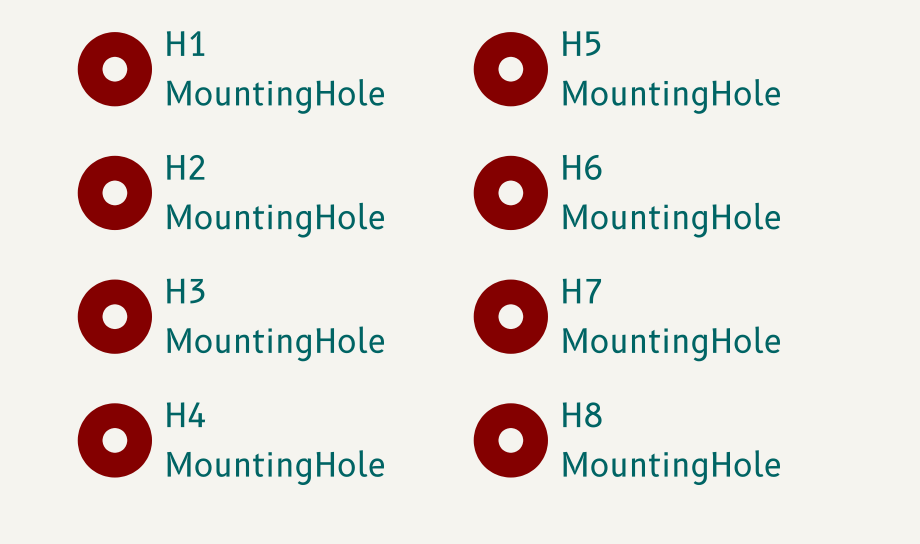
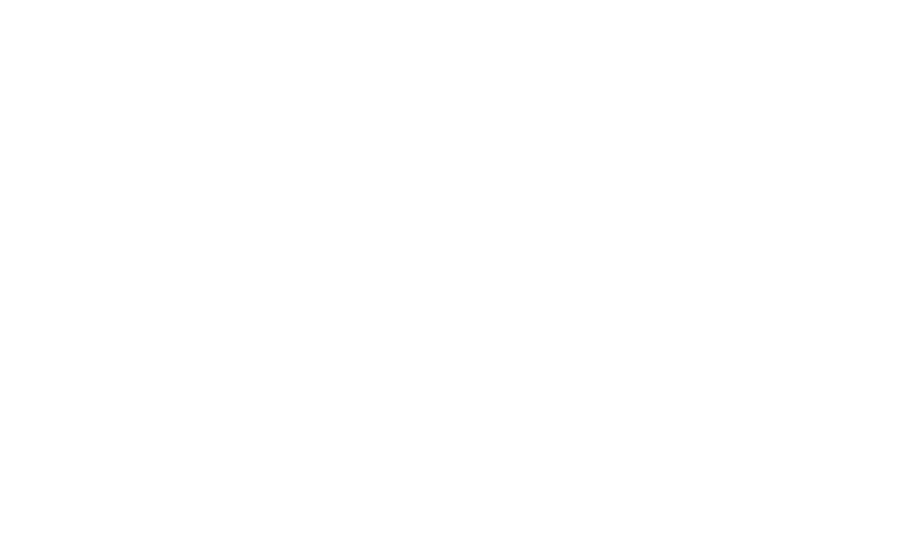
H1: MountingHole (114, 69) -> none
H5: MountingHole (510, 69) -> none
H2: MountingHole (114, 192) -> none
H6: MountingHole (510, 192) -> none
H3: MountingHole (114, 316) -> none
H7: MountingHole (510, 316) -> none
H4: MountingHole (114, 440) -> none
H8: MountingHole (510, 440) -> none

